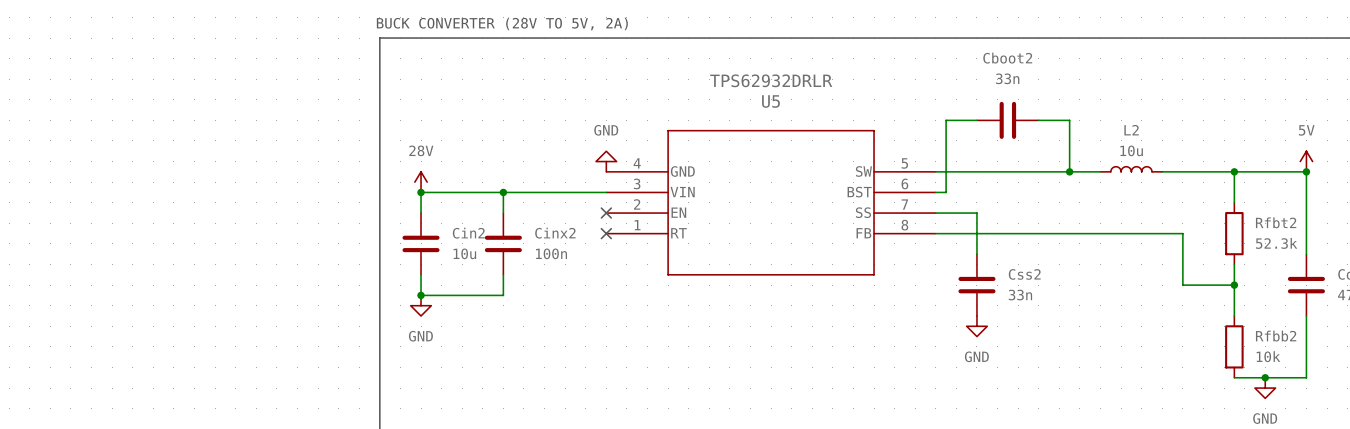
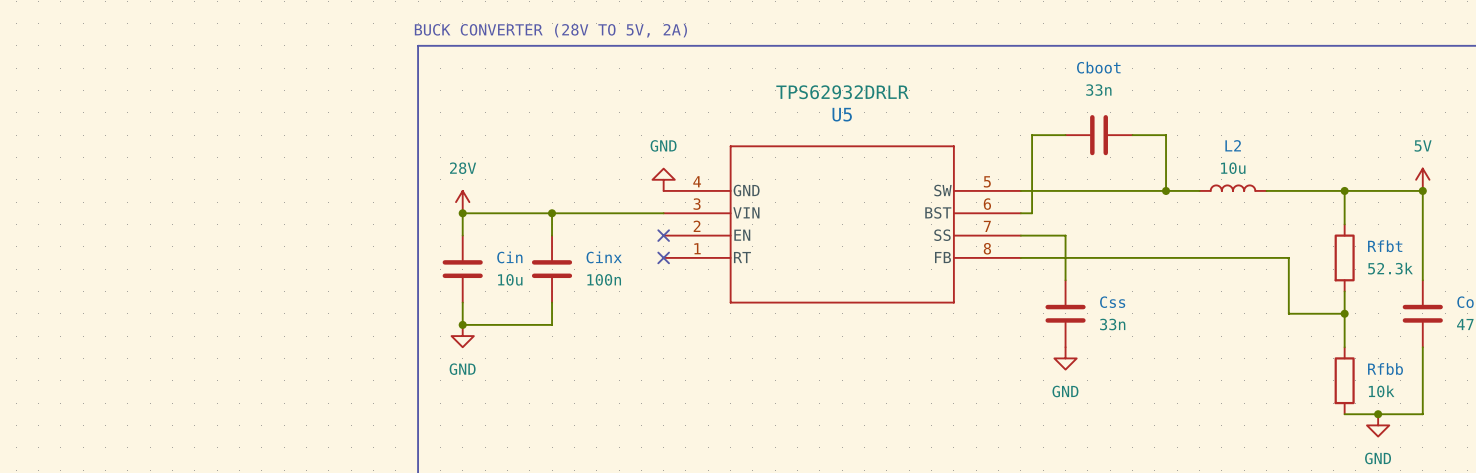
Cboot2 name: Cboot2 (1007, 58) -> Cboot (1098, 67)
Rfbt2 name: Rfbt2 (1276, 222) -> Rfbt (1385, 246)
Cin2 name: Cin2 (468, 233) -> Cin (509, 257)
Cinx2 name: Cinx2 (555, 233) -> Cinx (604, 257)
Css2 name: Css2 (1024, 274) -> Css (1112, 302)
Rfbb2 name: Rfbb2 (1276, 336) -> Rfbb (1385, 369)

